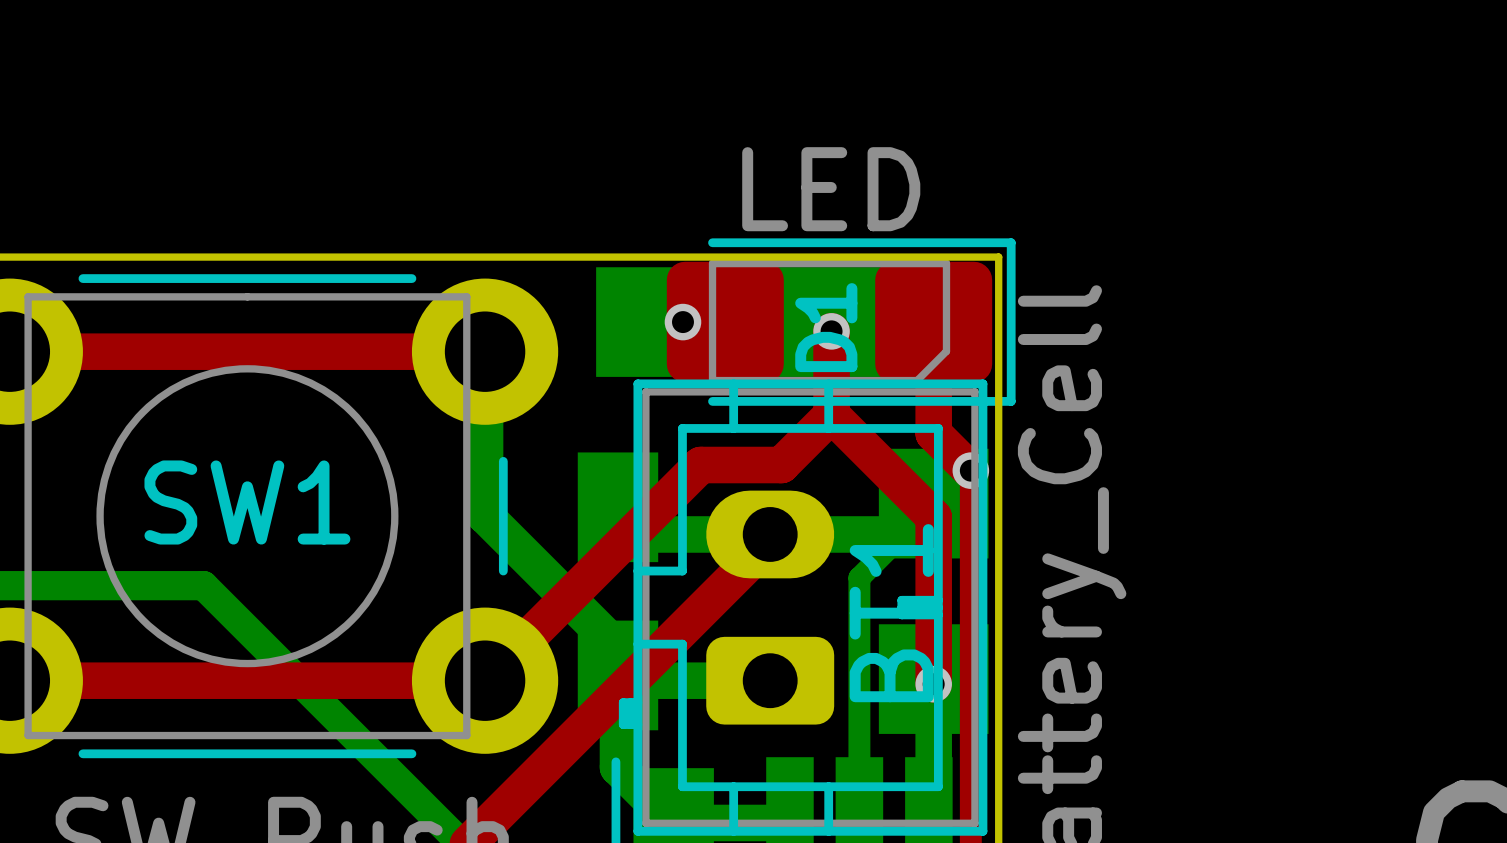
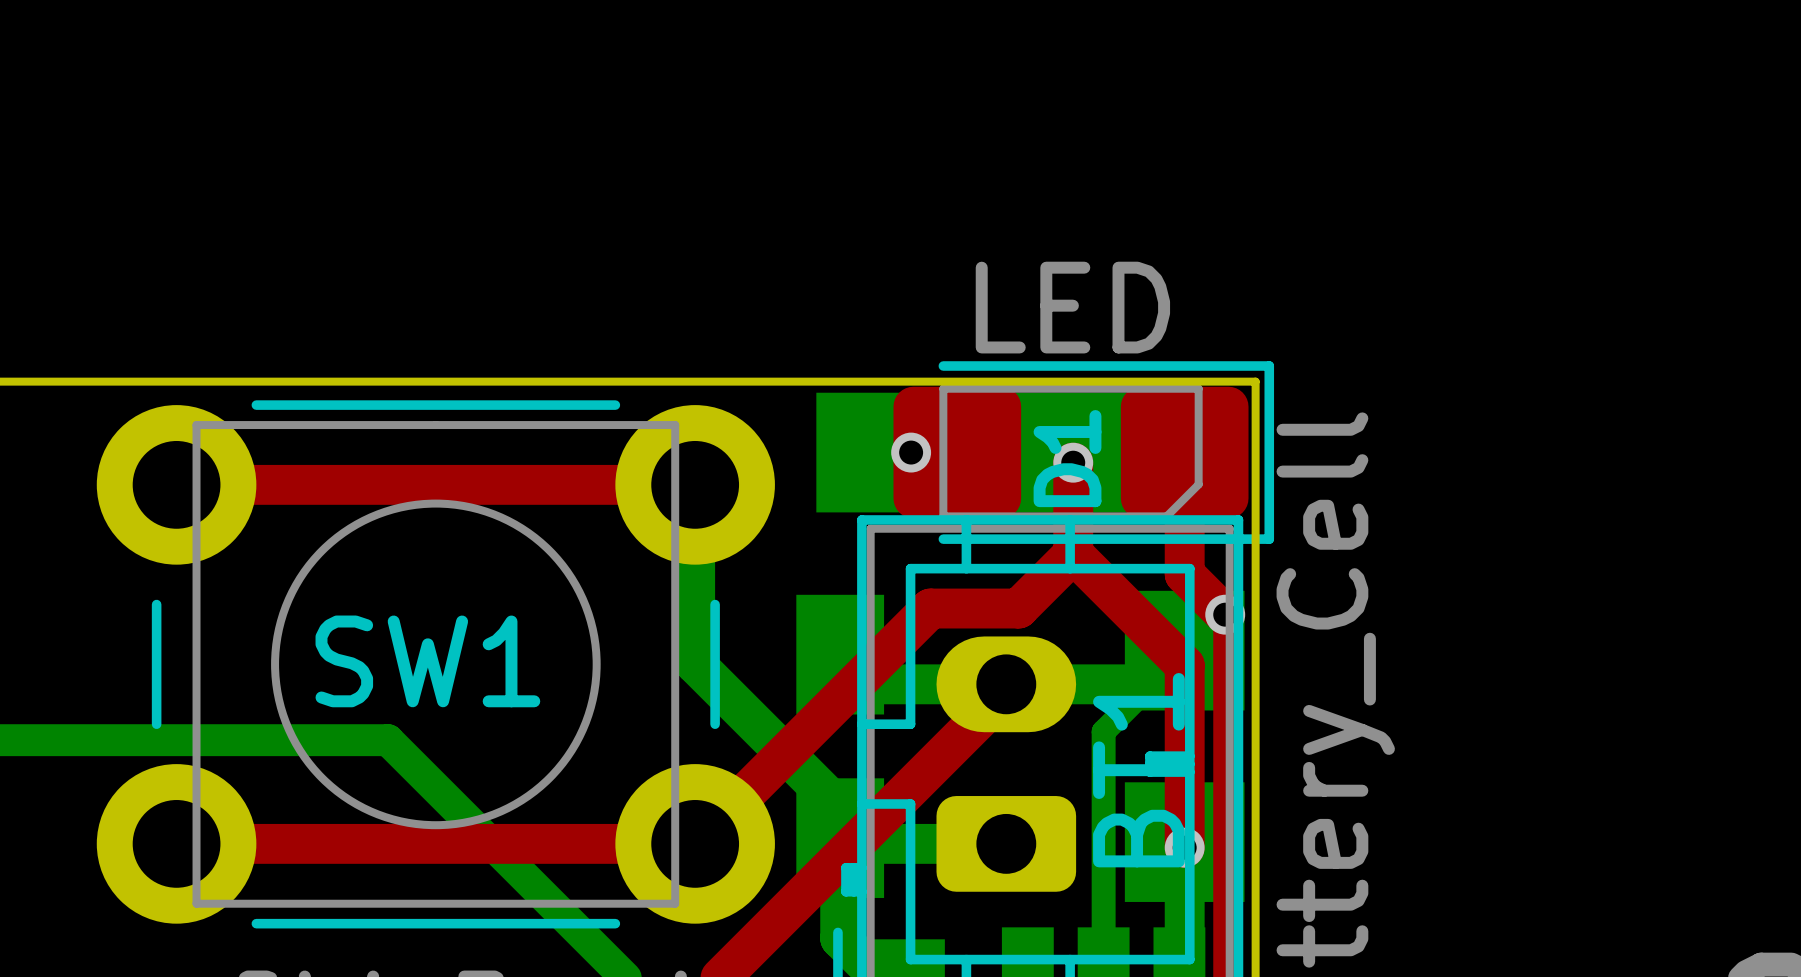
SW1 name position: SW1 (247, 502) -> SW1 (427, 661)

